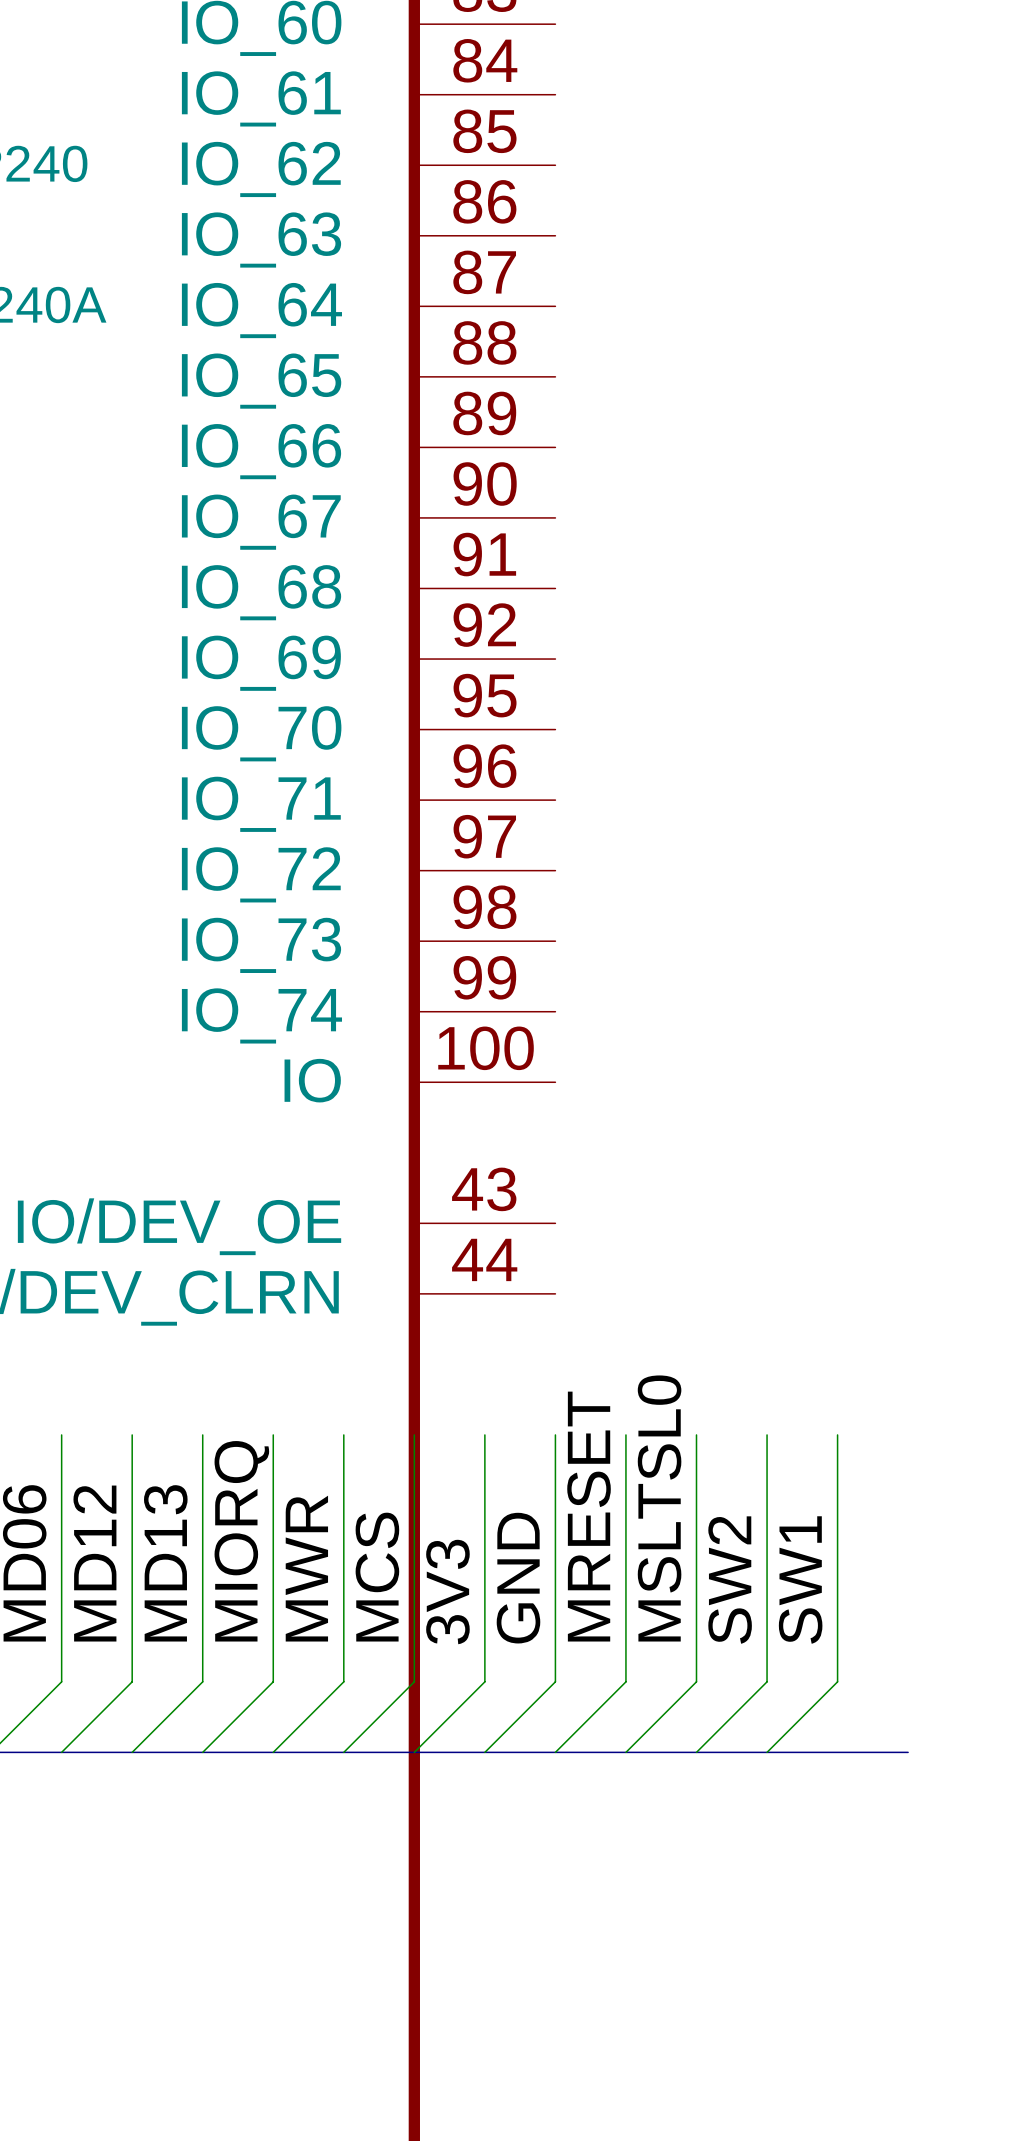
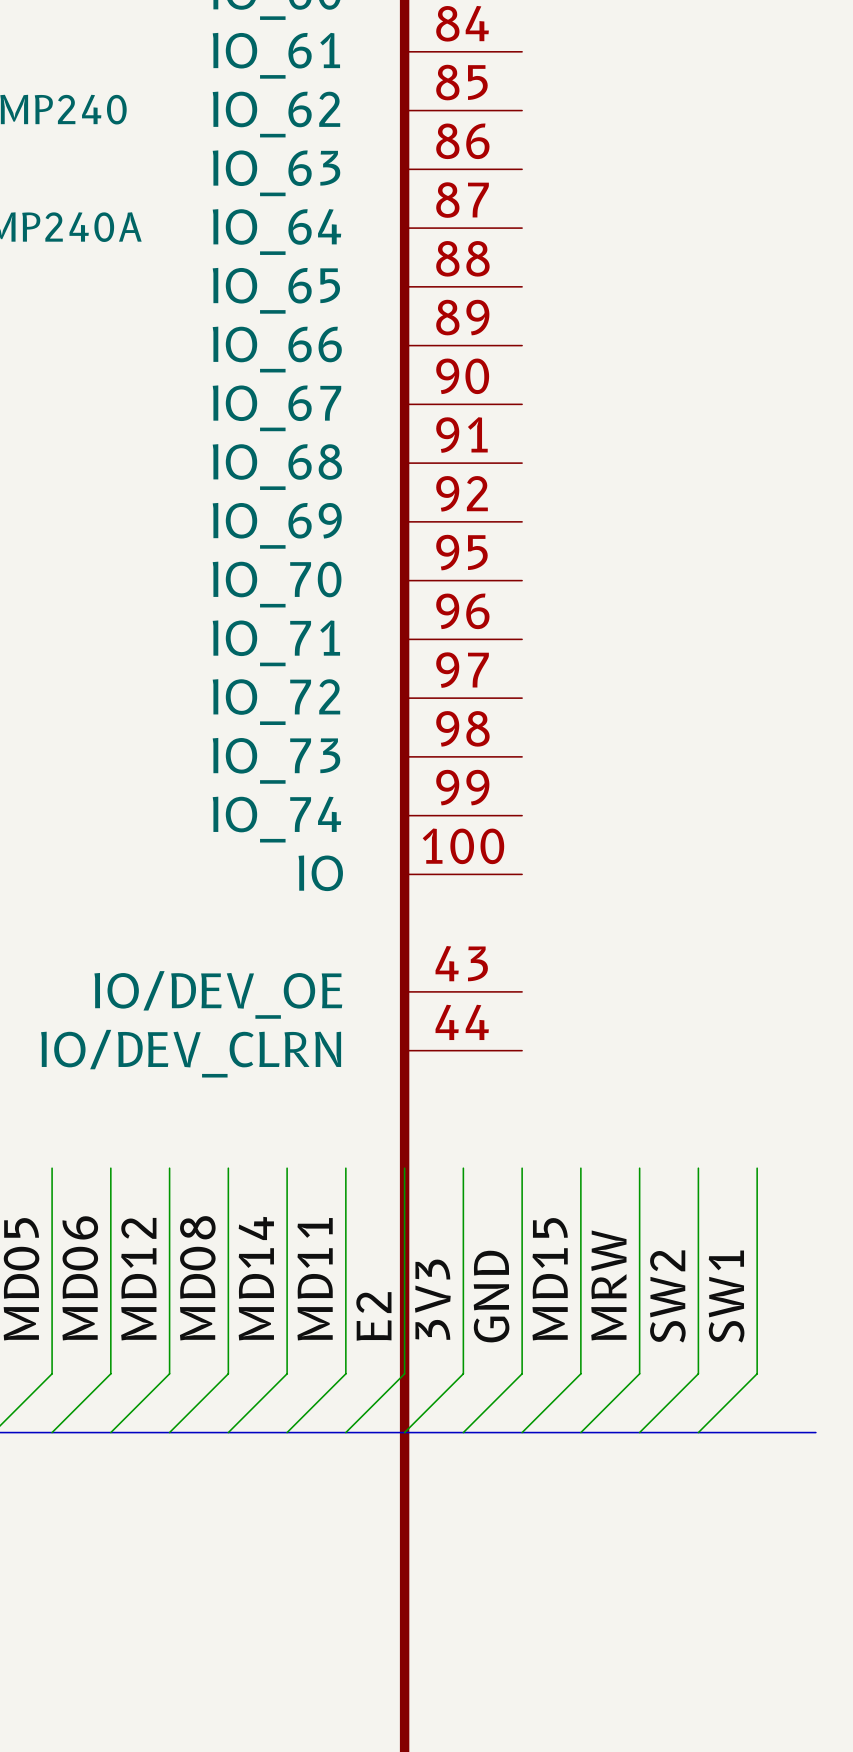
label: MSLTSL0 (659, 1508) -> MRW (608, 1285)
label: MRESET (589, 1516) -> MD15 (550, 1279)
label: MIORQ (241, 1541) -> MD14 (256, 1278)
label: MD13 (165, 1563) -> MD08 (197, 1278)
label: MWR (306, 1568) -> MD11 (315, 1279)
label: MCS (377, 1577) -> E2 (373, 1316)

